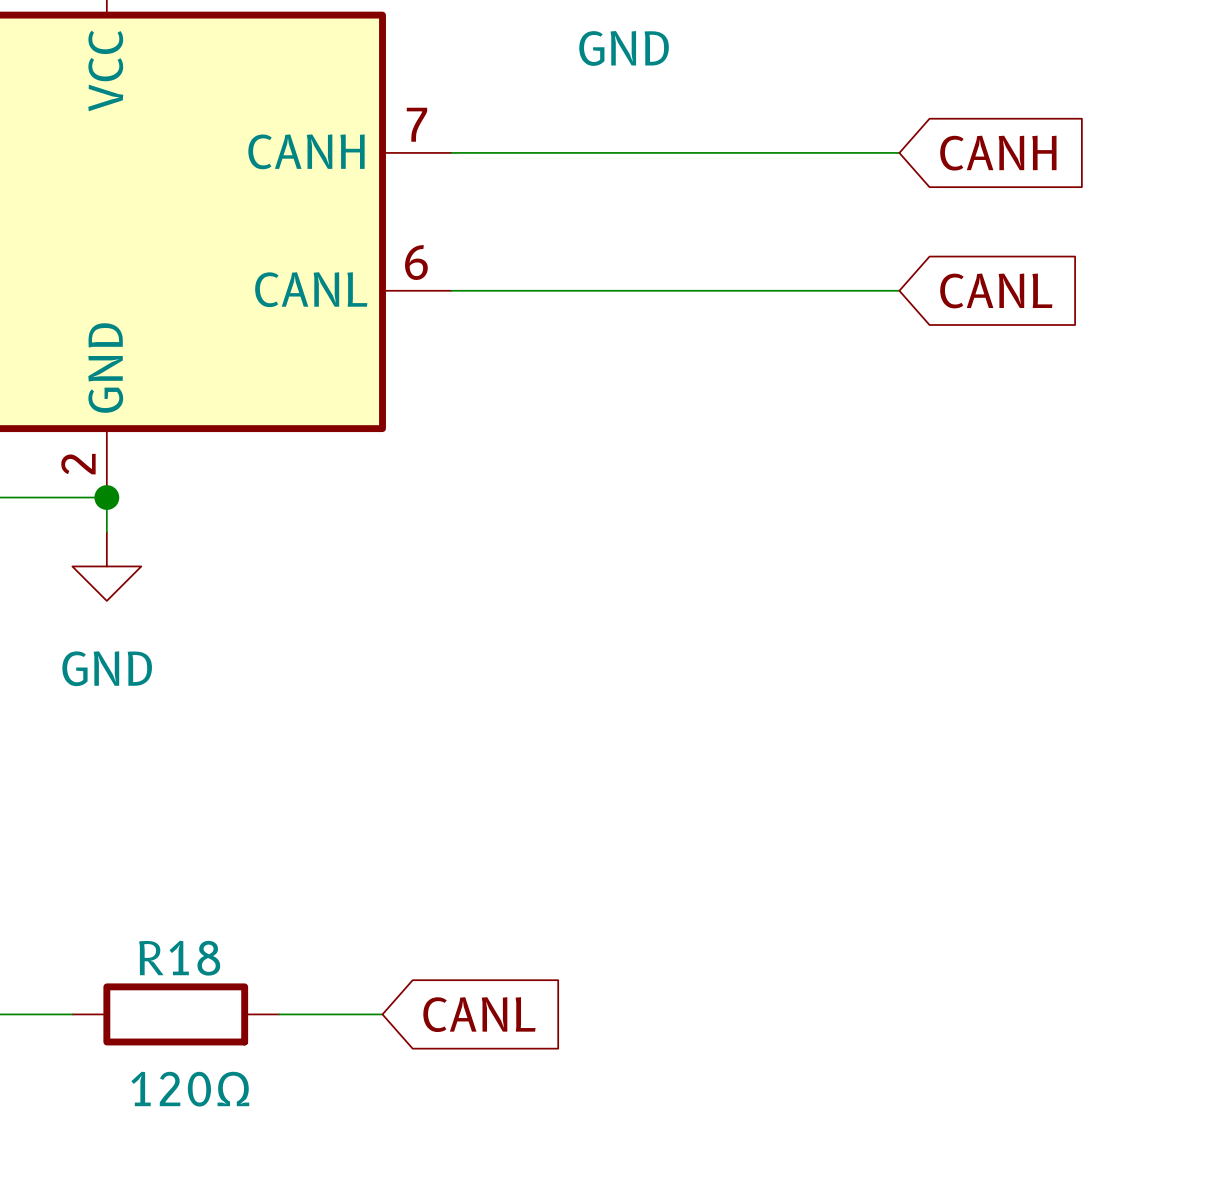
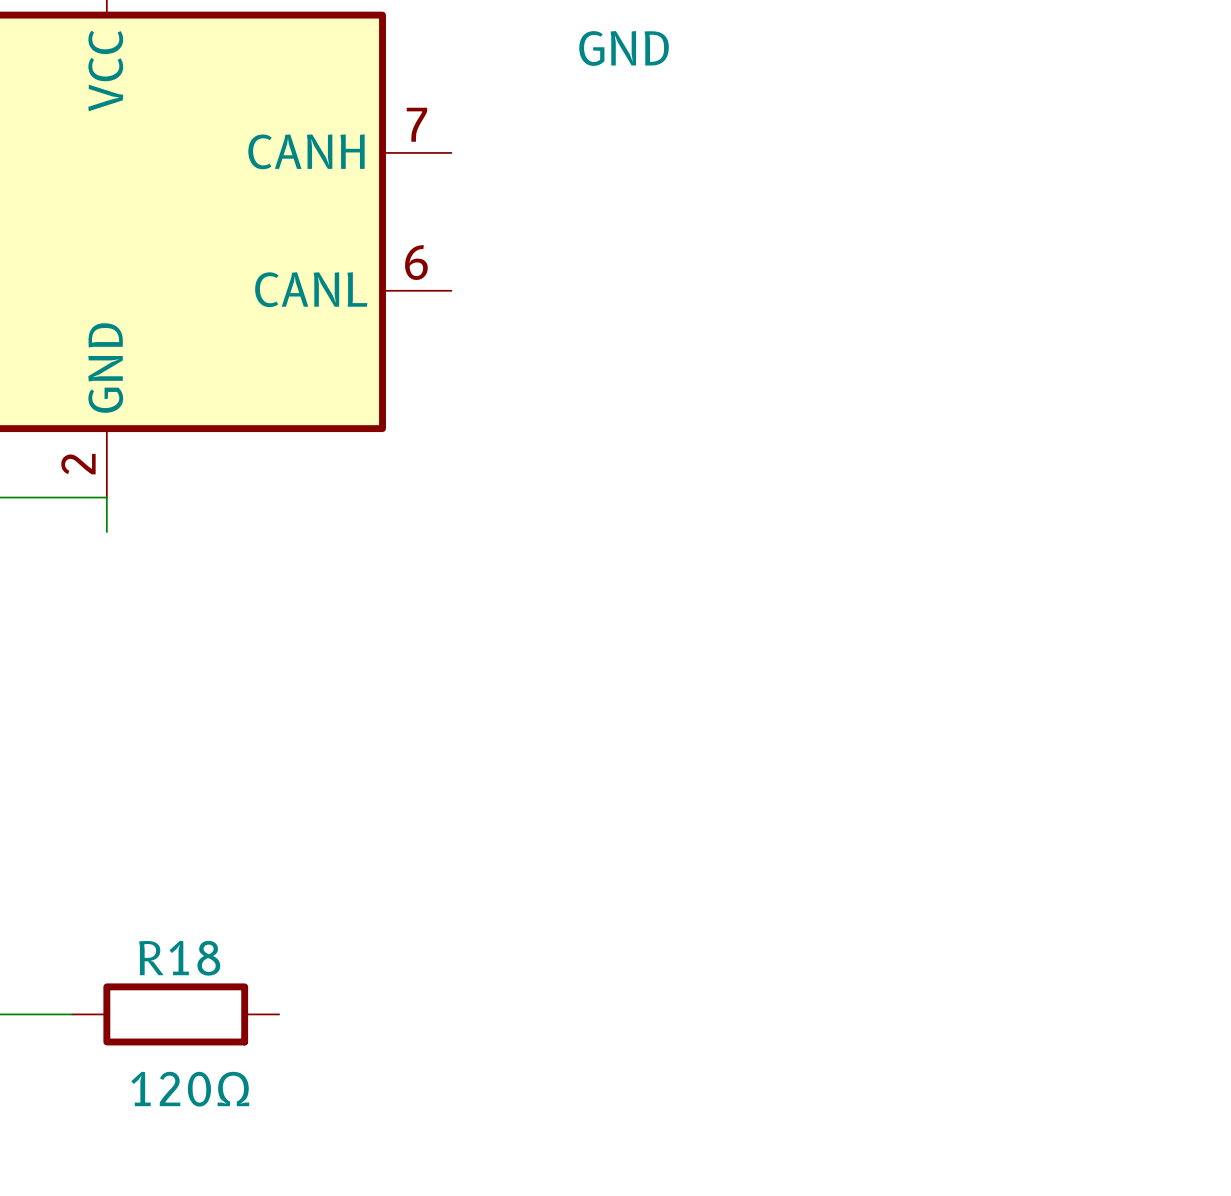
wire: (451, 152) (899, 152) -> none
global label: CANH (998, 153) -> none
wire: (451, 290) (899, 290) -> none
global label: CANL (996, 290) -> none
junction: (106, 497) -> none
power symbol: GND (106, 566) -> none
wire: (279, 1014) (382, 1014) -> none
global label: CANL (479, 1014) -> none

